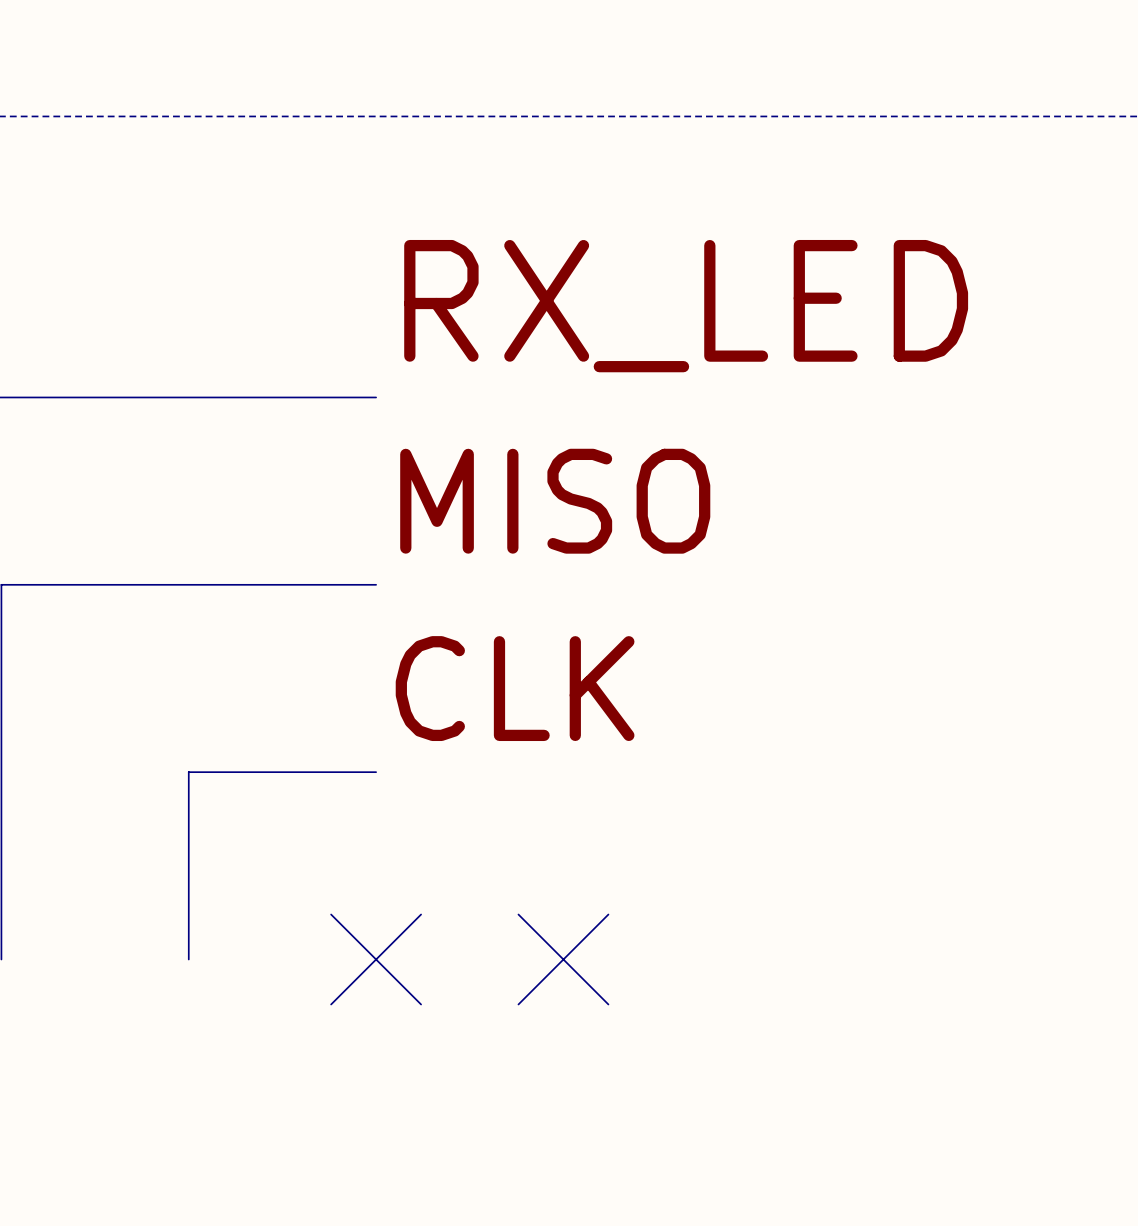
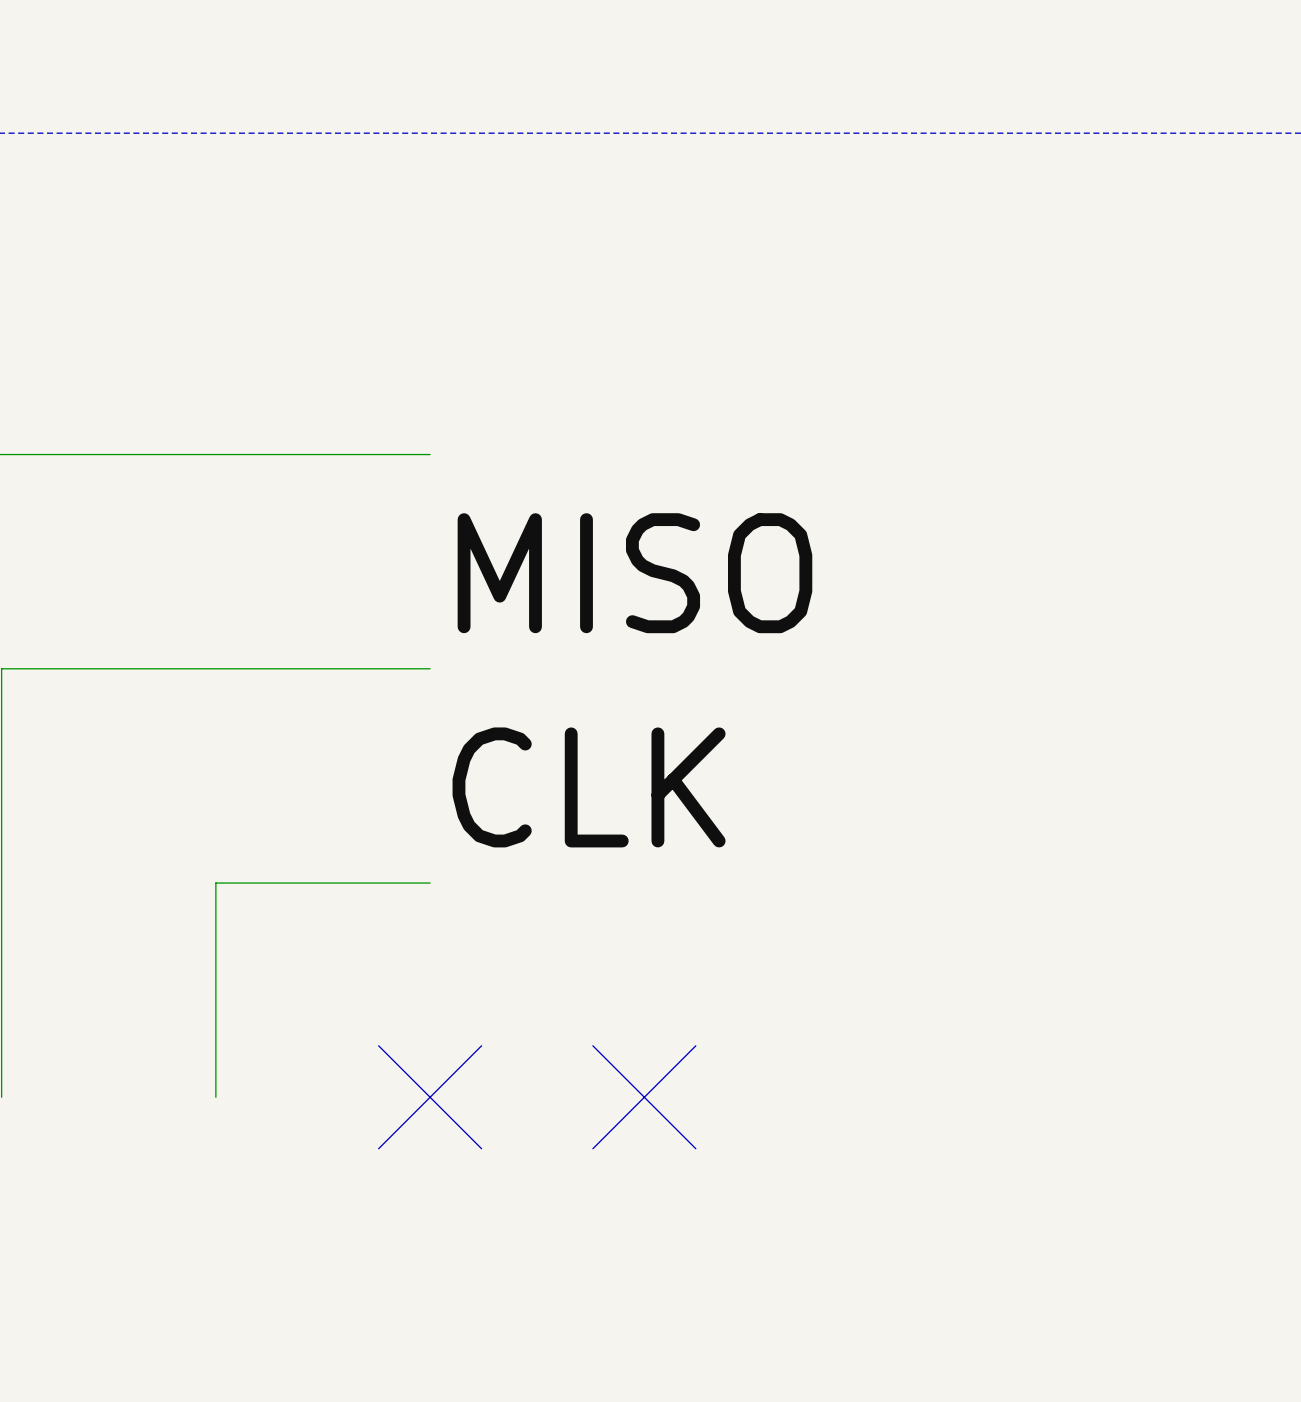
label: RX_LED (686, 306) -> none

